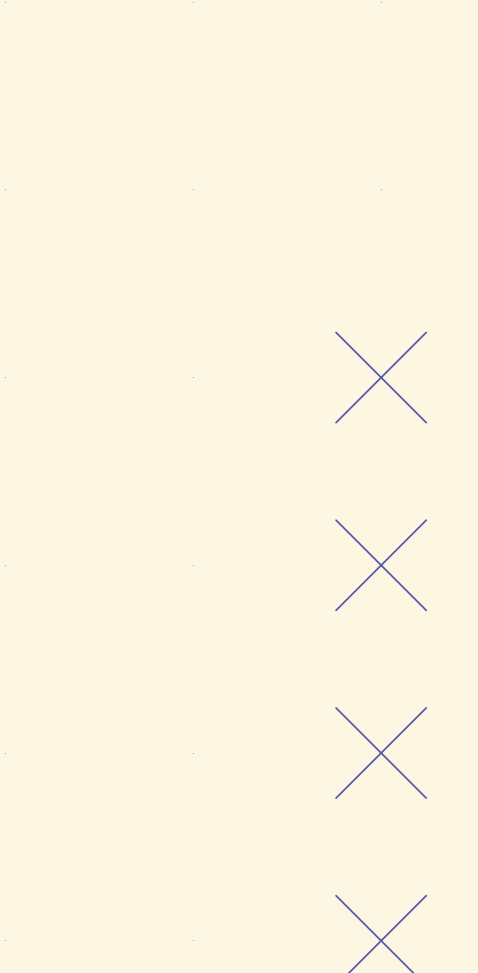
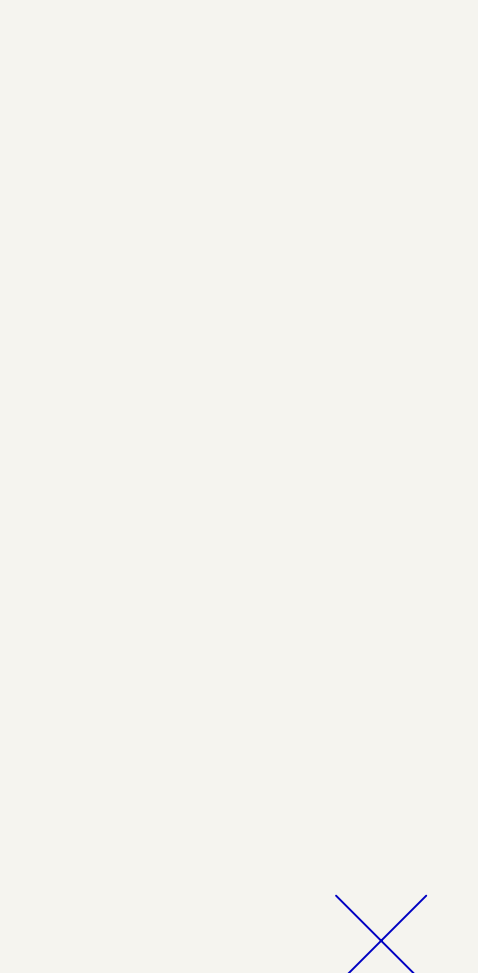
no-connect mark: (381, 377) -> none
no-connect mark: (381, 565) -> none
no-connect mark: (381, 753) -> none

